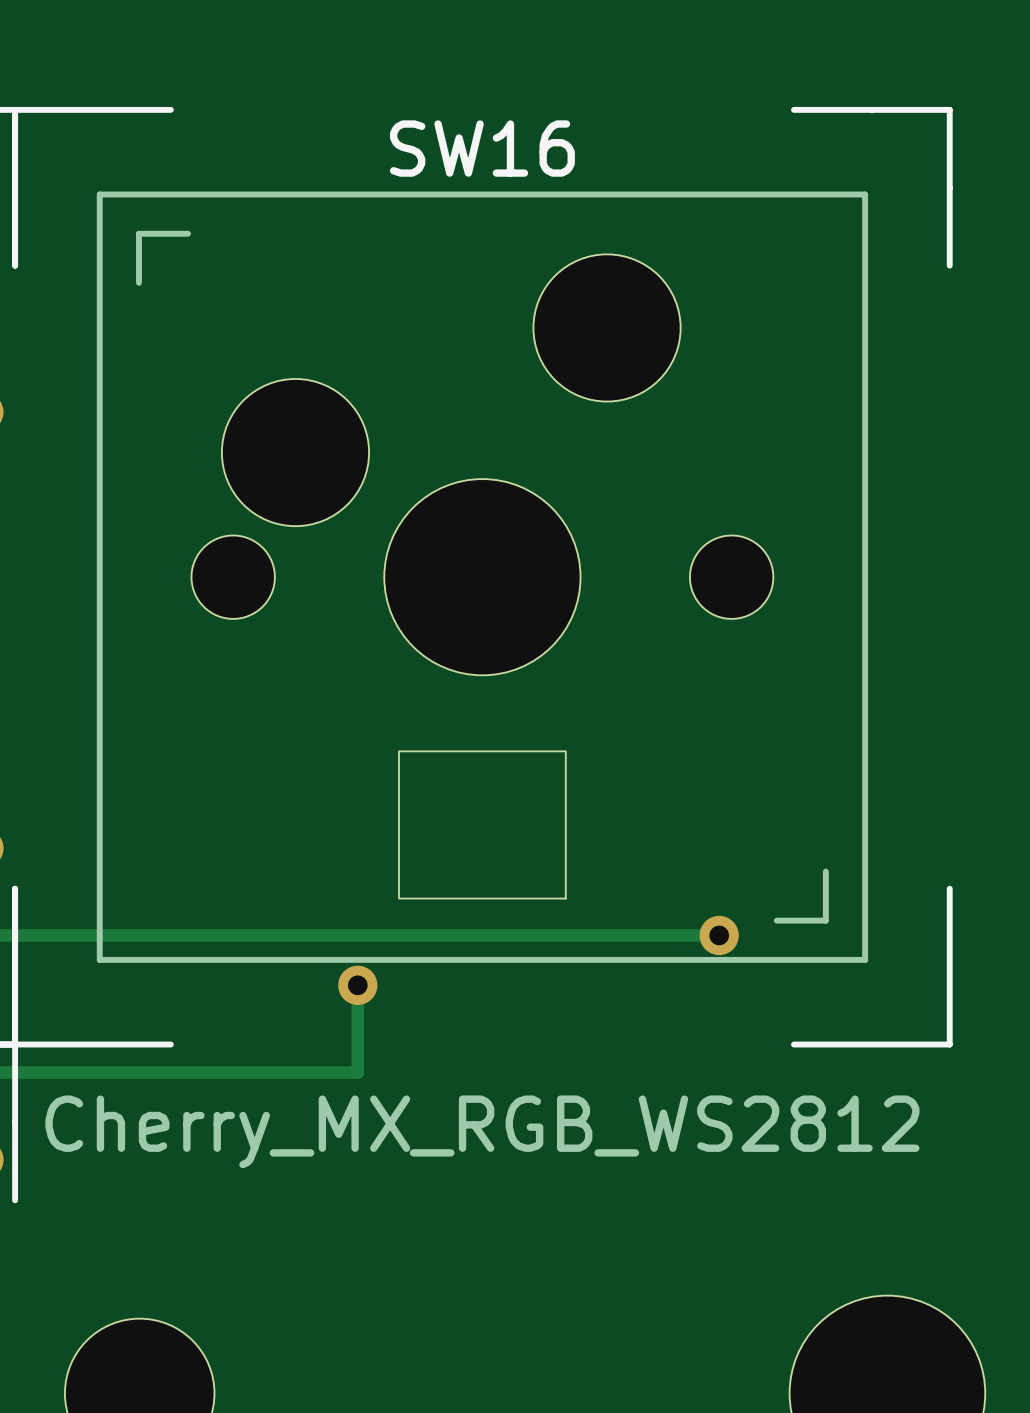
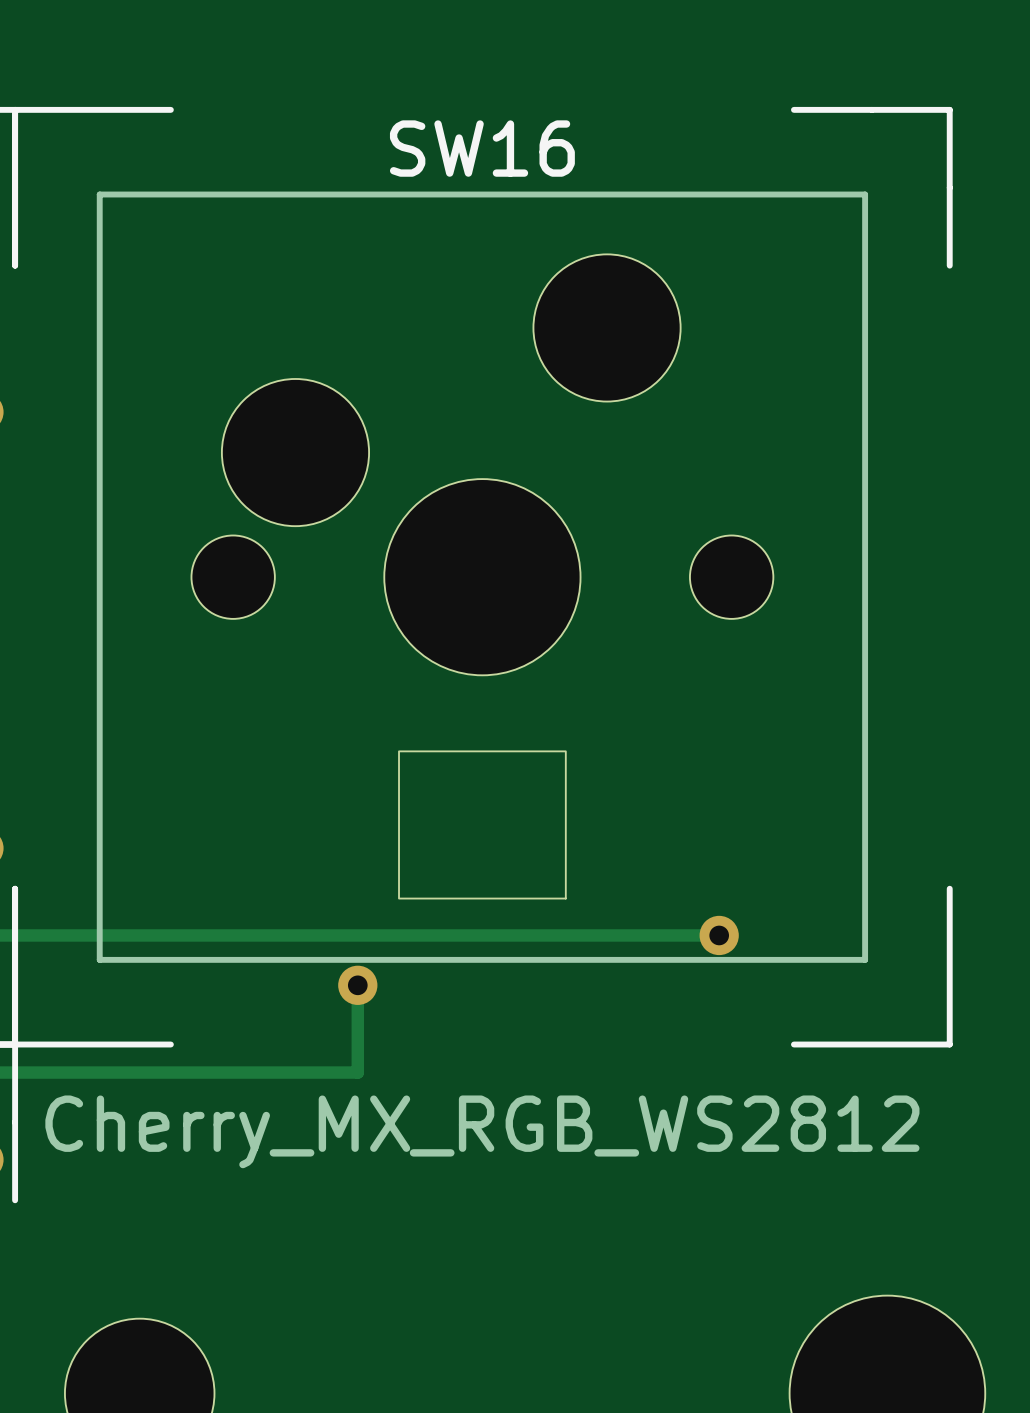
SW16 footprint: [12, 106, 953, 1048] -> [12, 106, 953, 1048]

